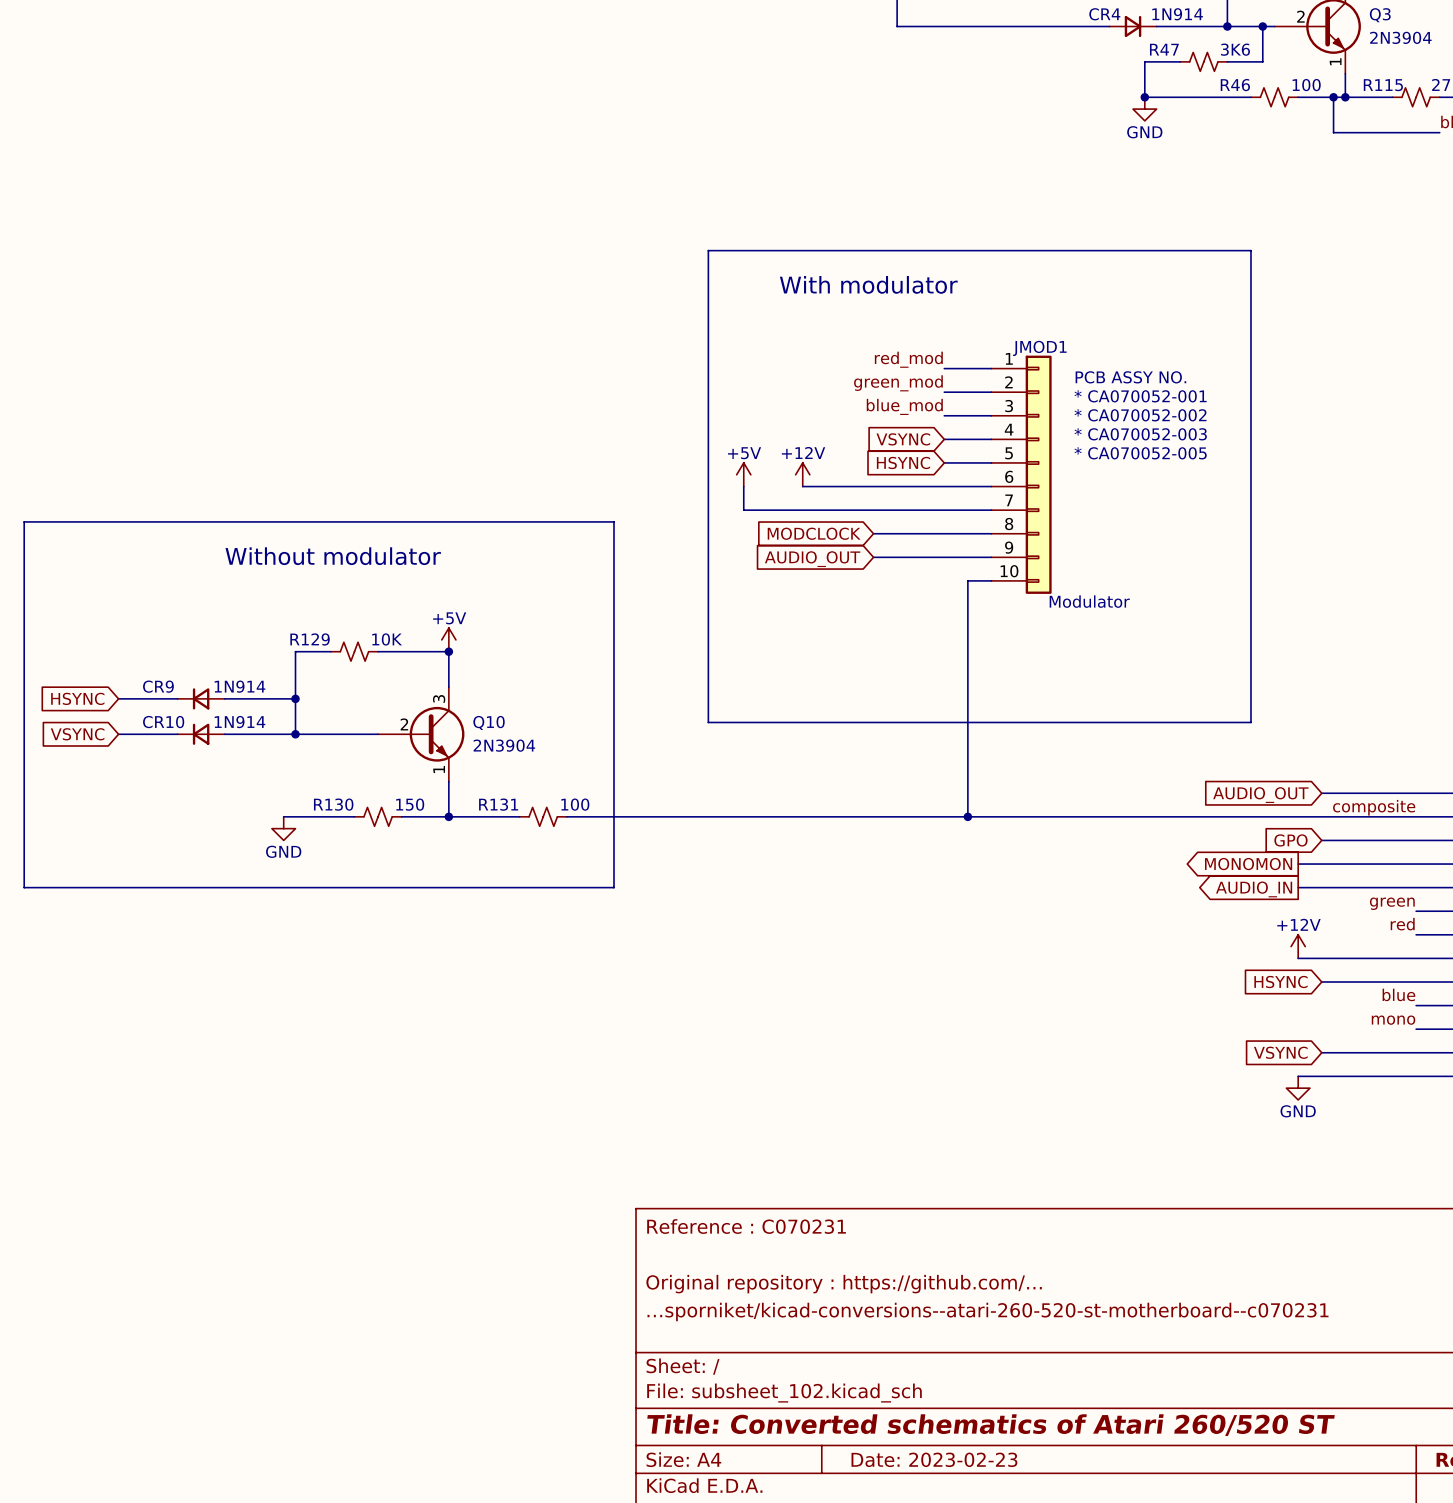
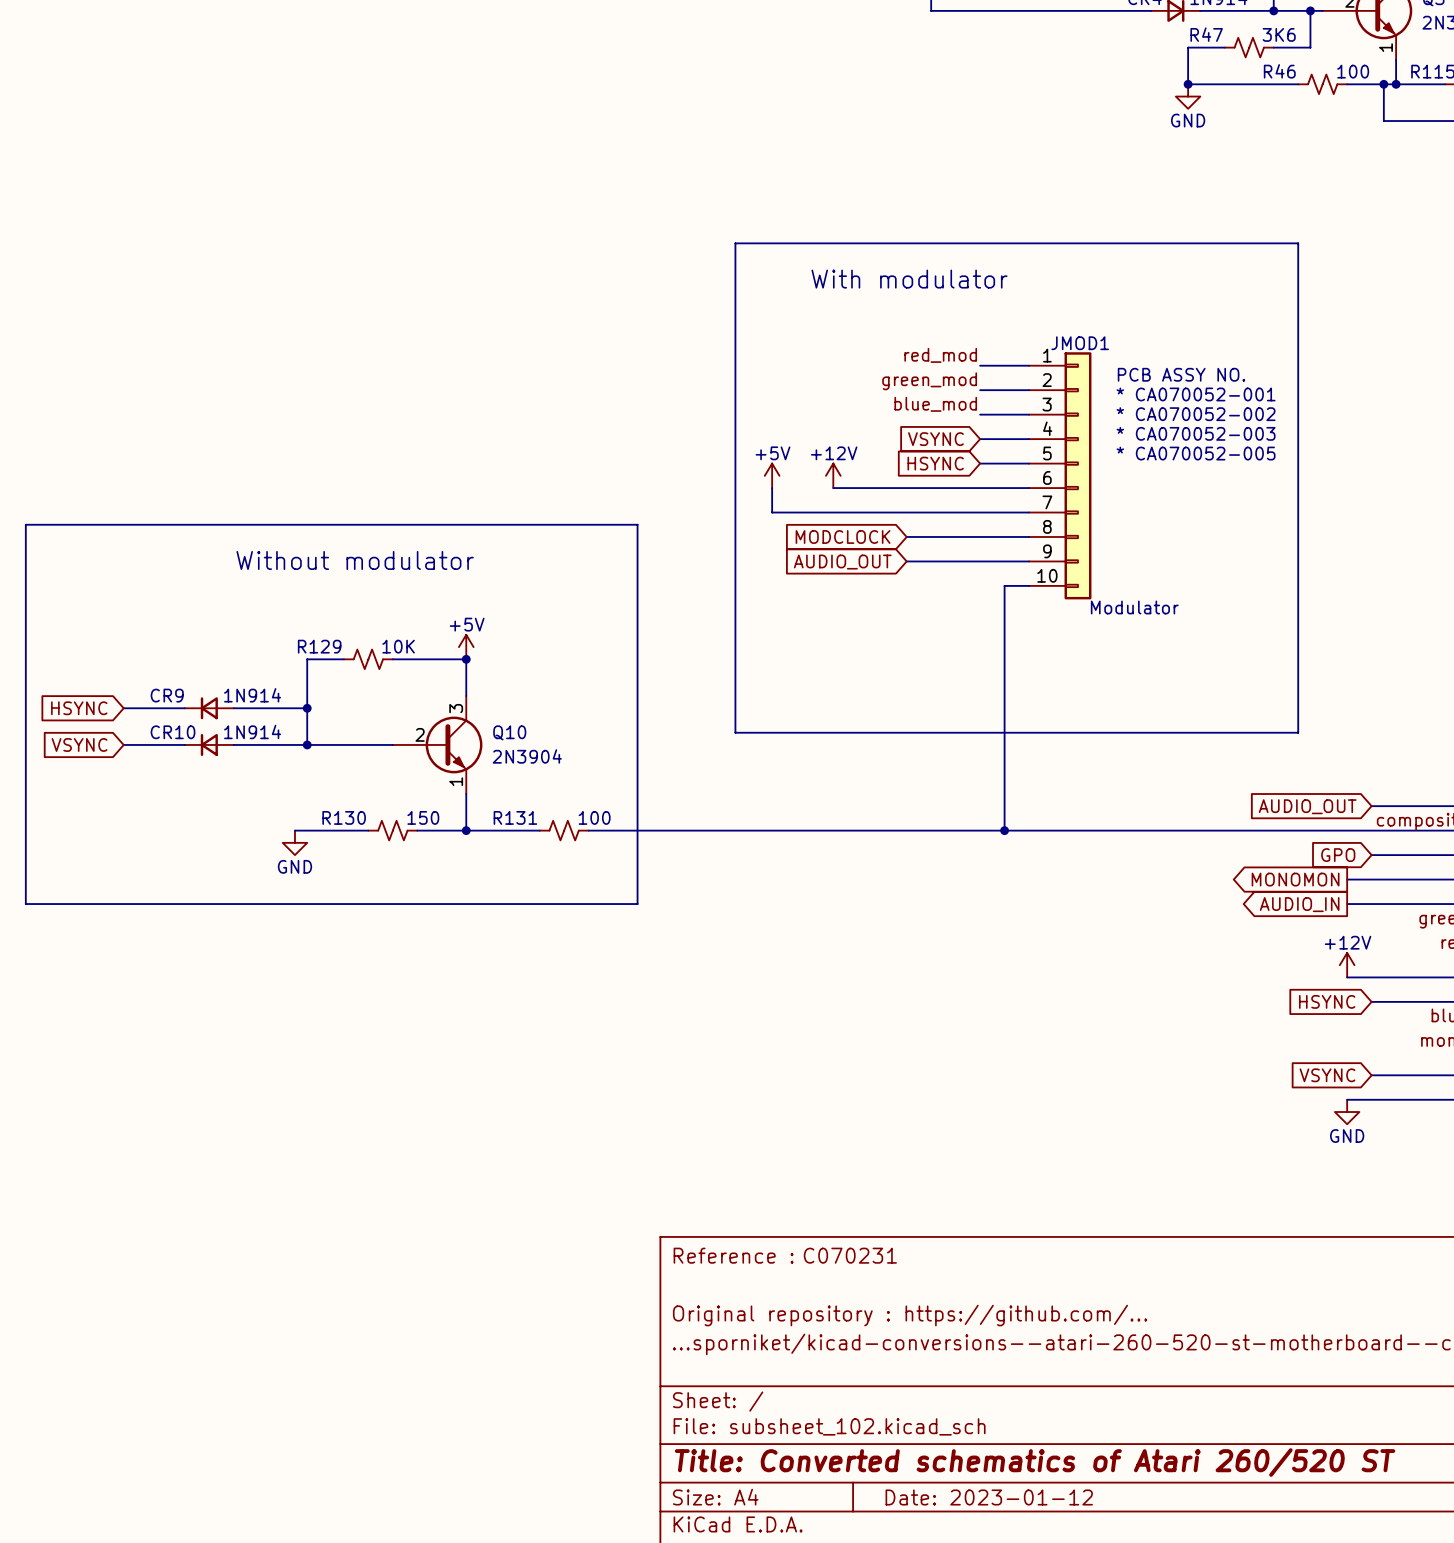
title block: Date: 2023-02-23 (934, 1459) -> Date: 2023-01-12 (989, 1497)

